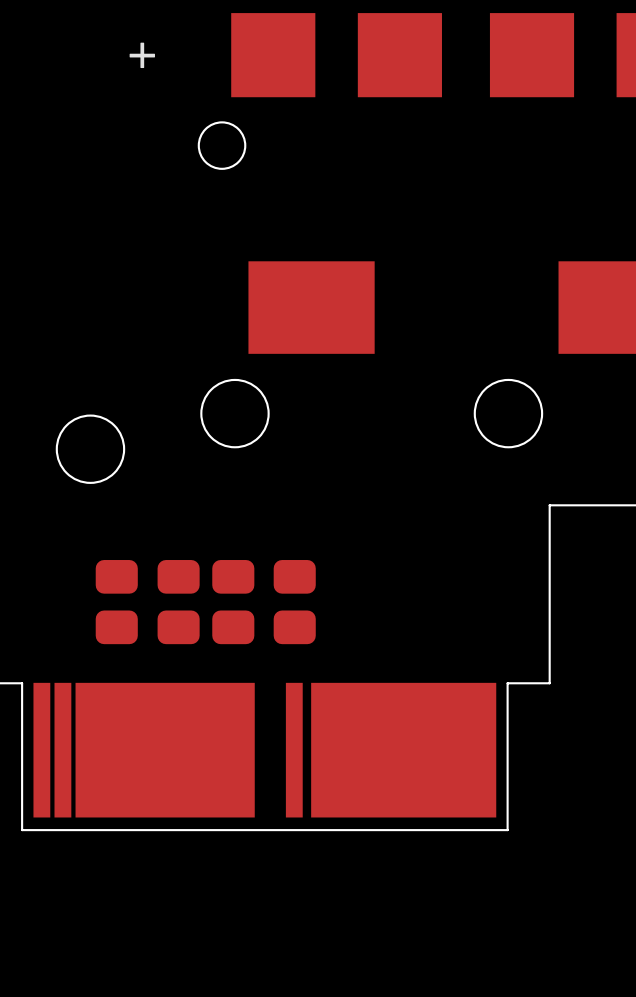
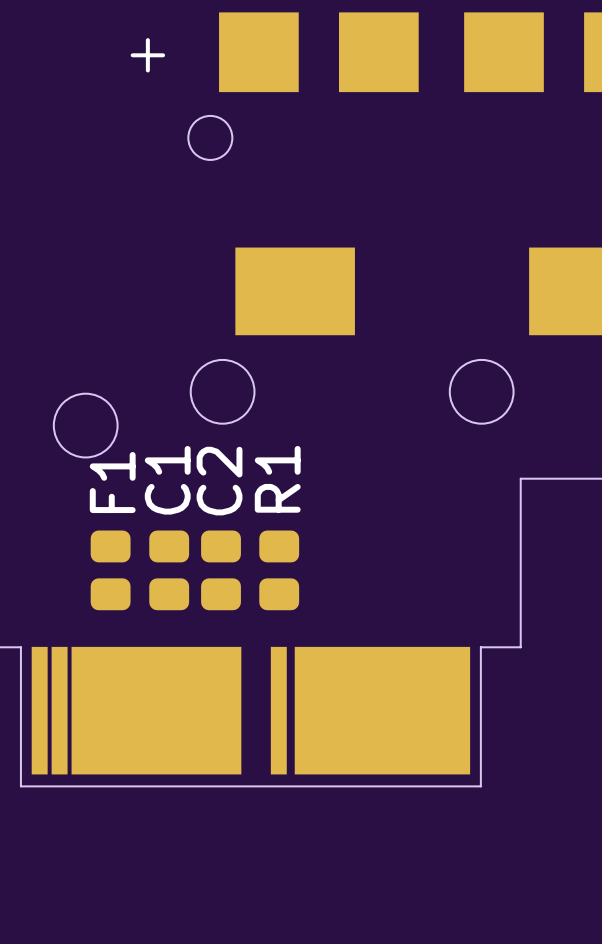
R1 name: none -> R1 (277, 479)
C1 name: none -> C1 (167, 480)
C2 name: none -> C2 (219, 481)
F1 name: none -> F1 (112, 482)

